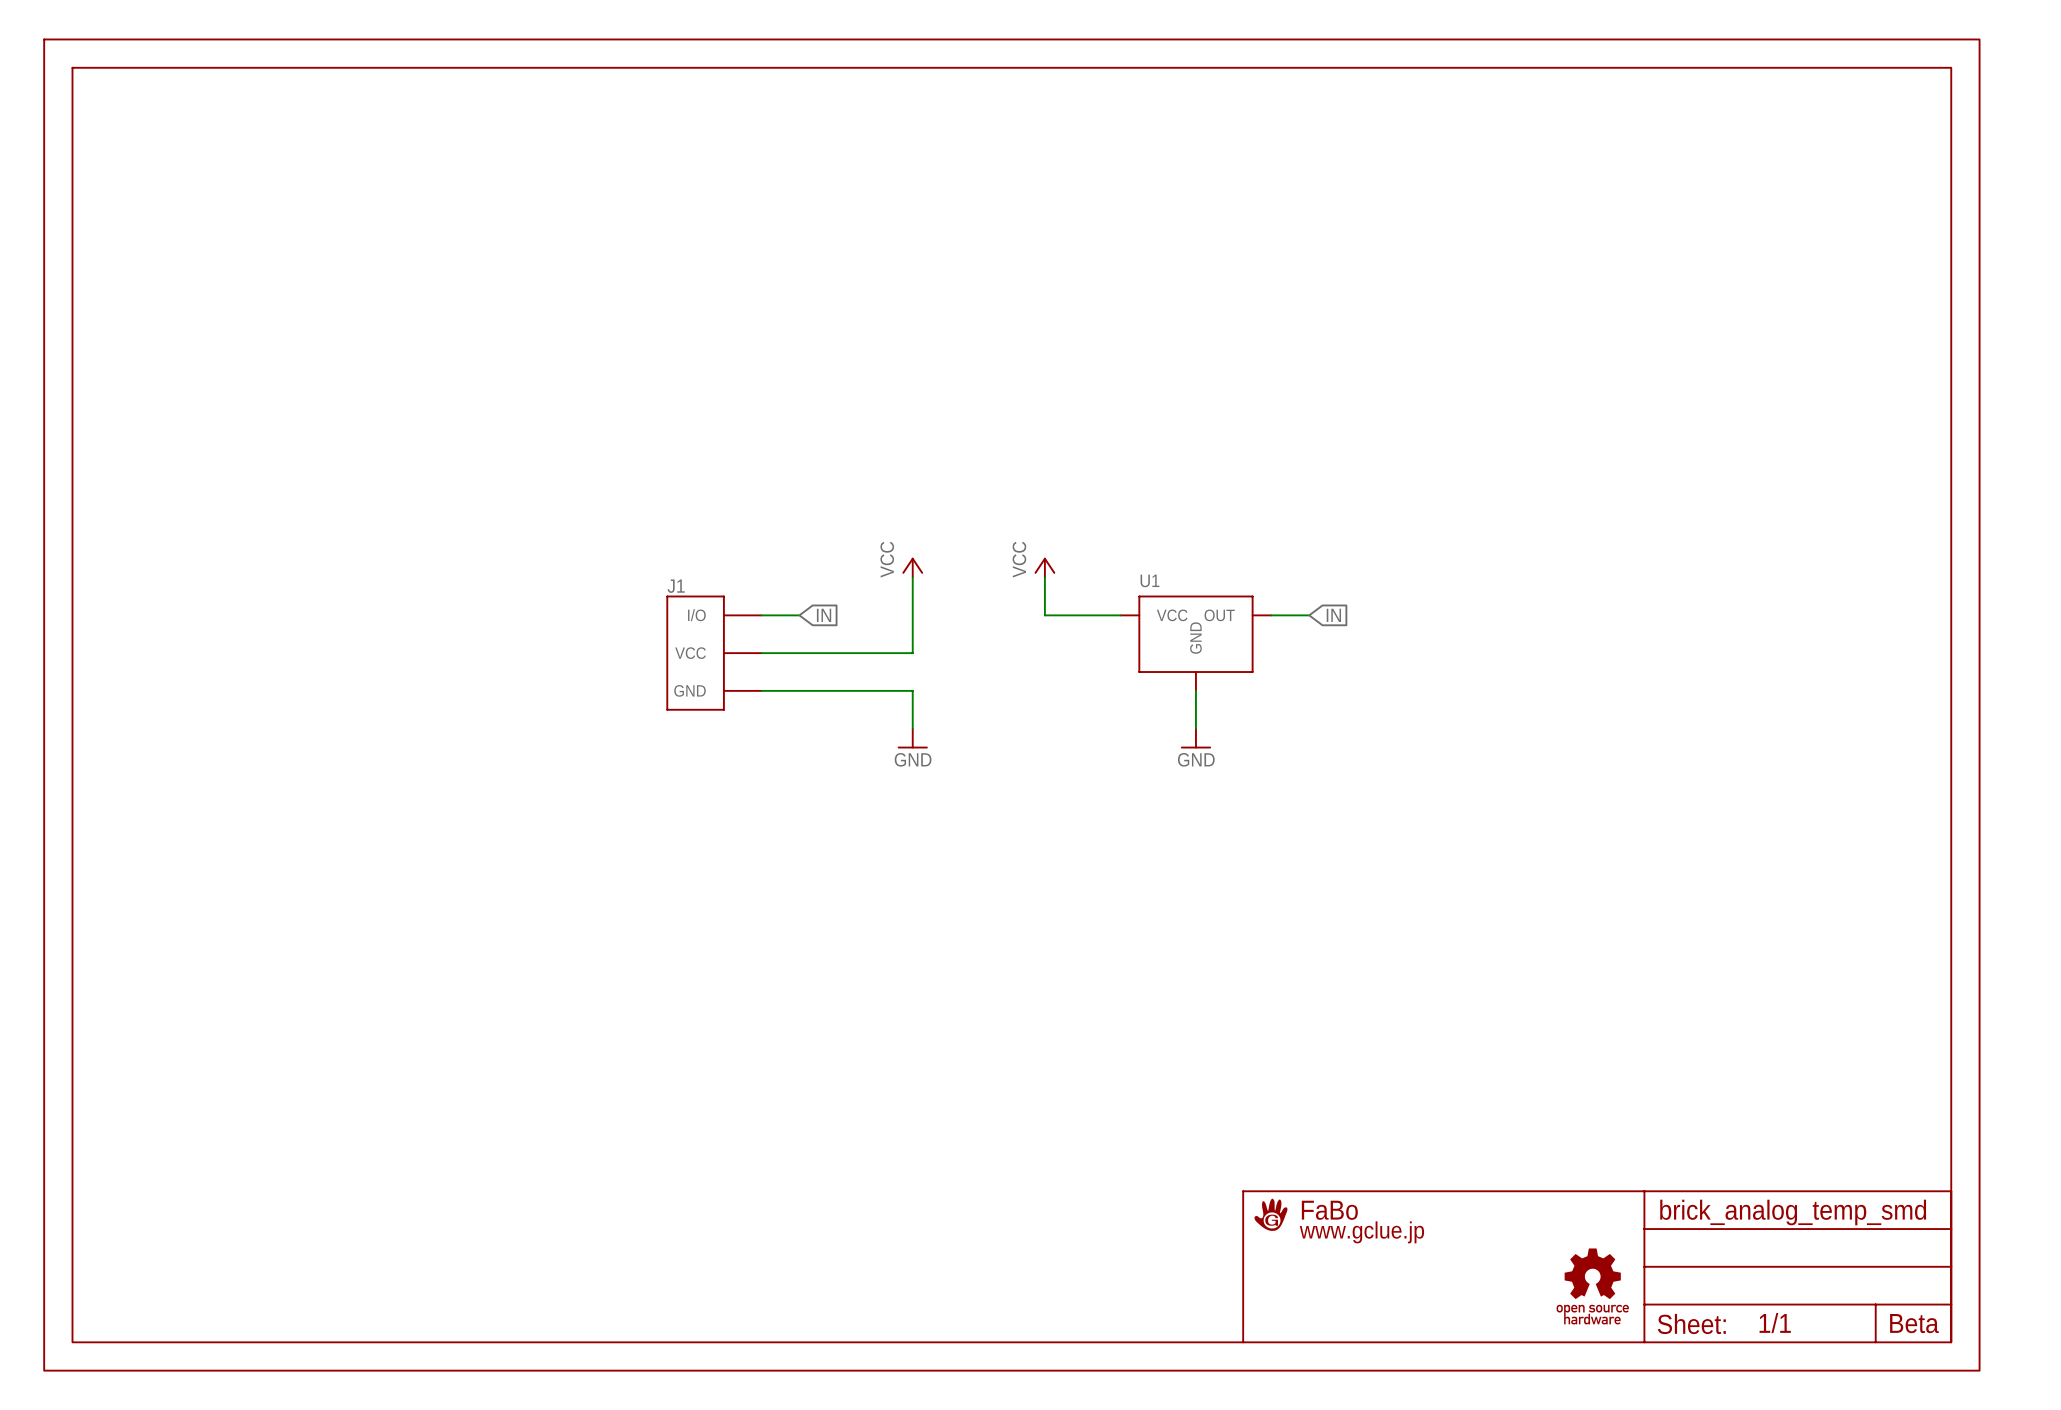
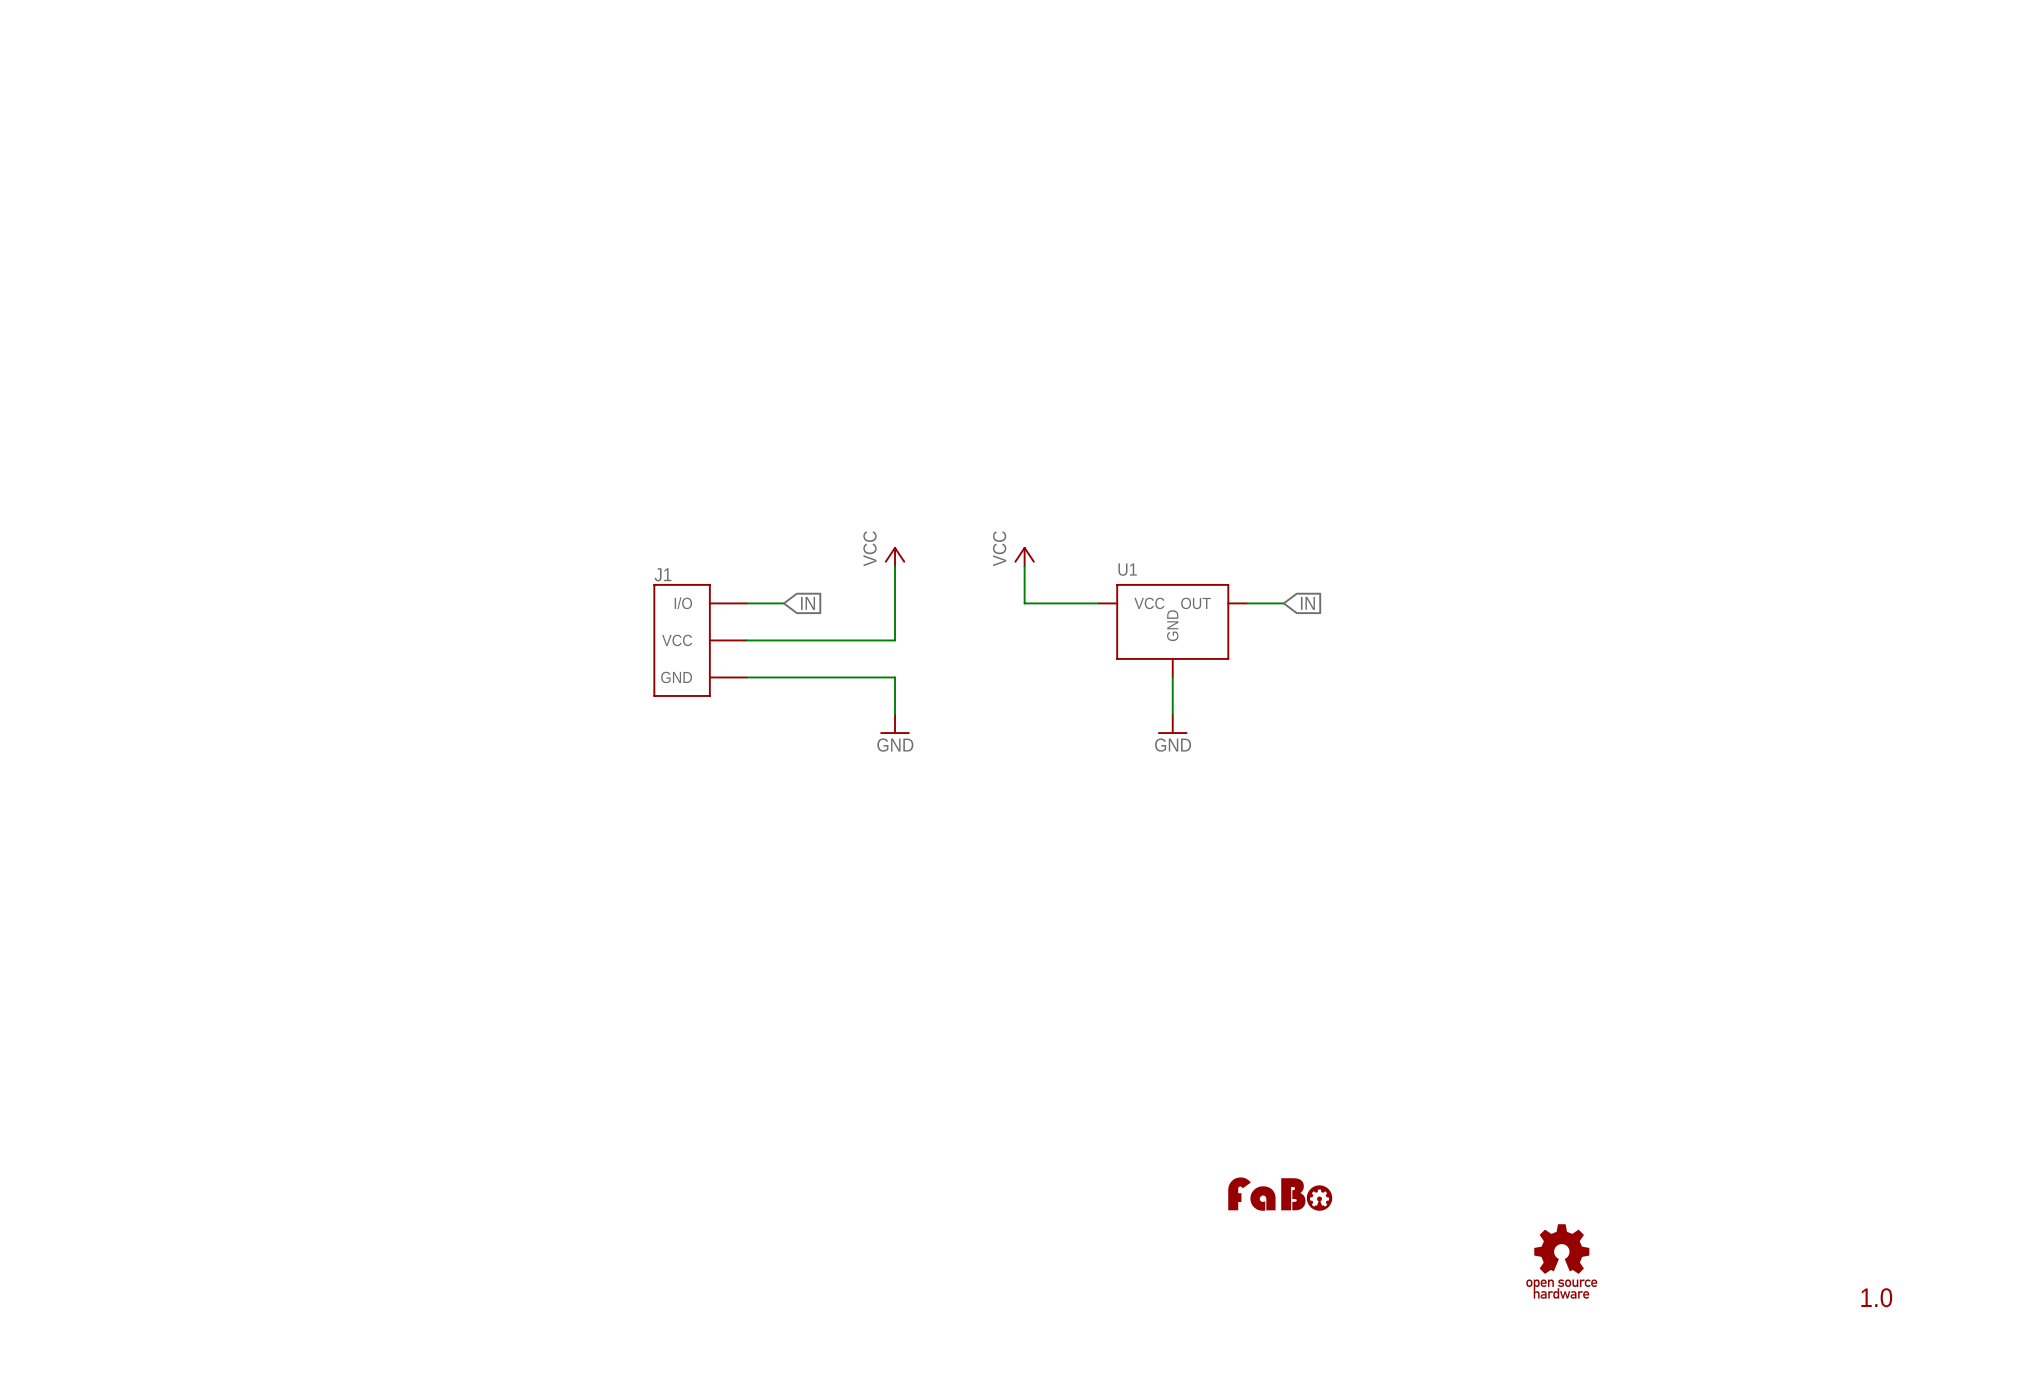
part: (1011, 705) -> none
part: none -> (1280, 1194)
text: Beta (1914, 1323) -> 1.0 (1876, 1297)

